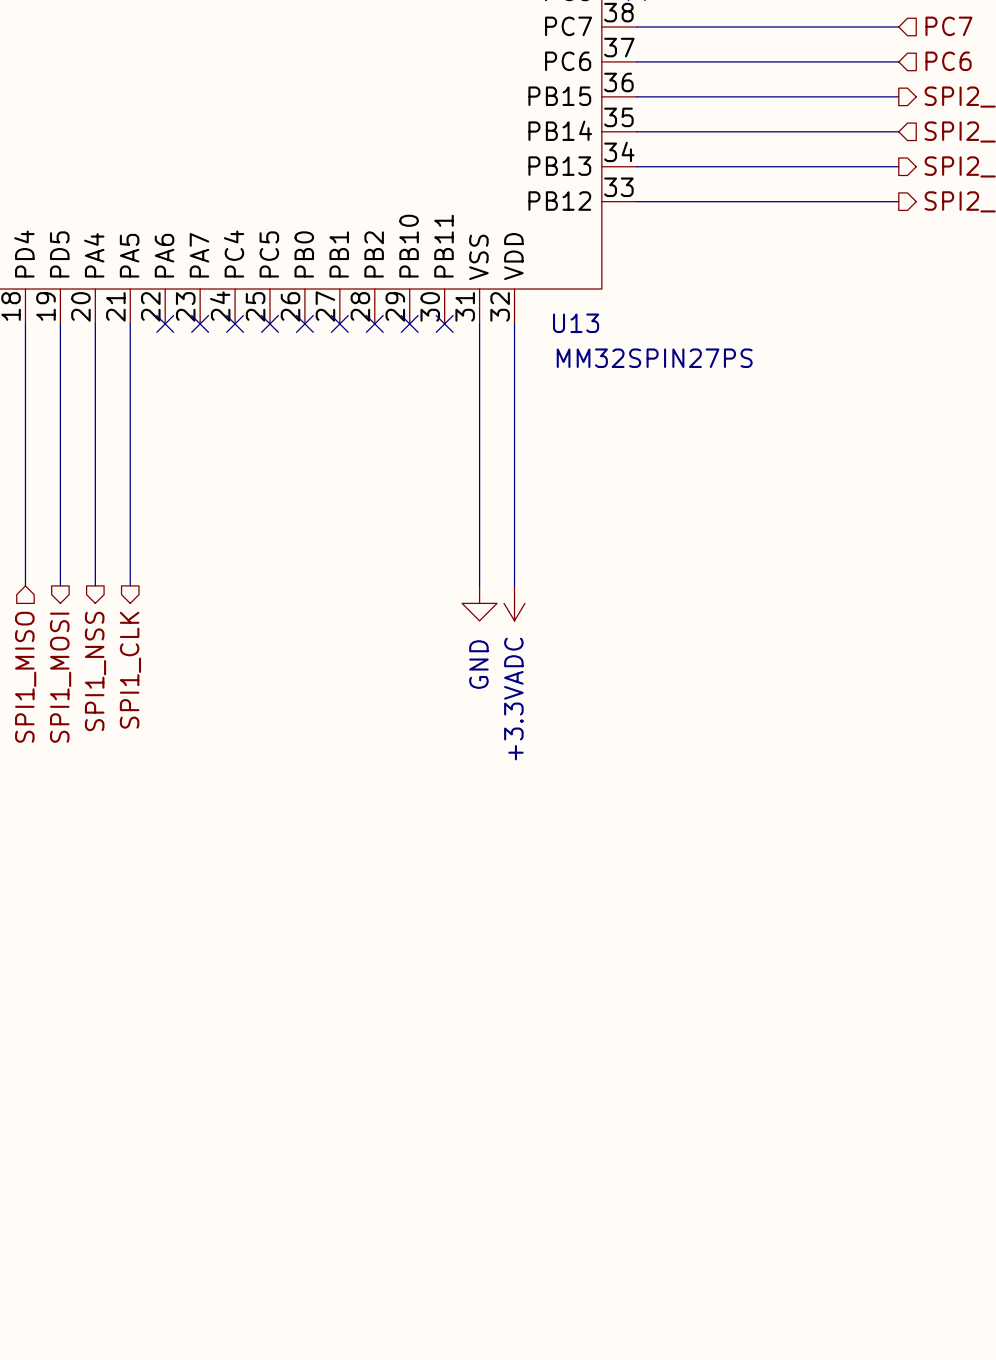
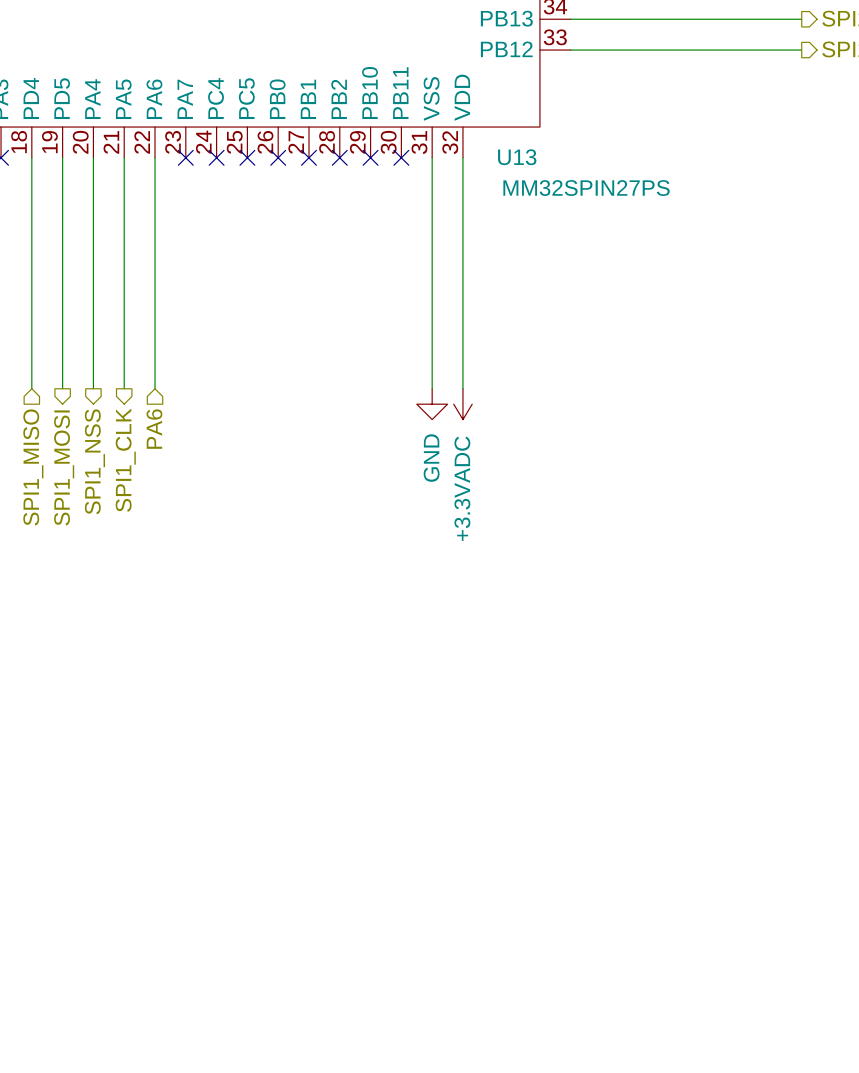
wire: none -> (155, 157) (155, 388)
no-connect mark: (165, 323) -> none
hierarchical label: none -> PA6 (154, 429)

